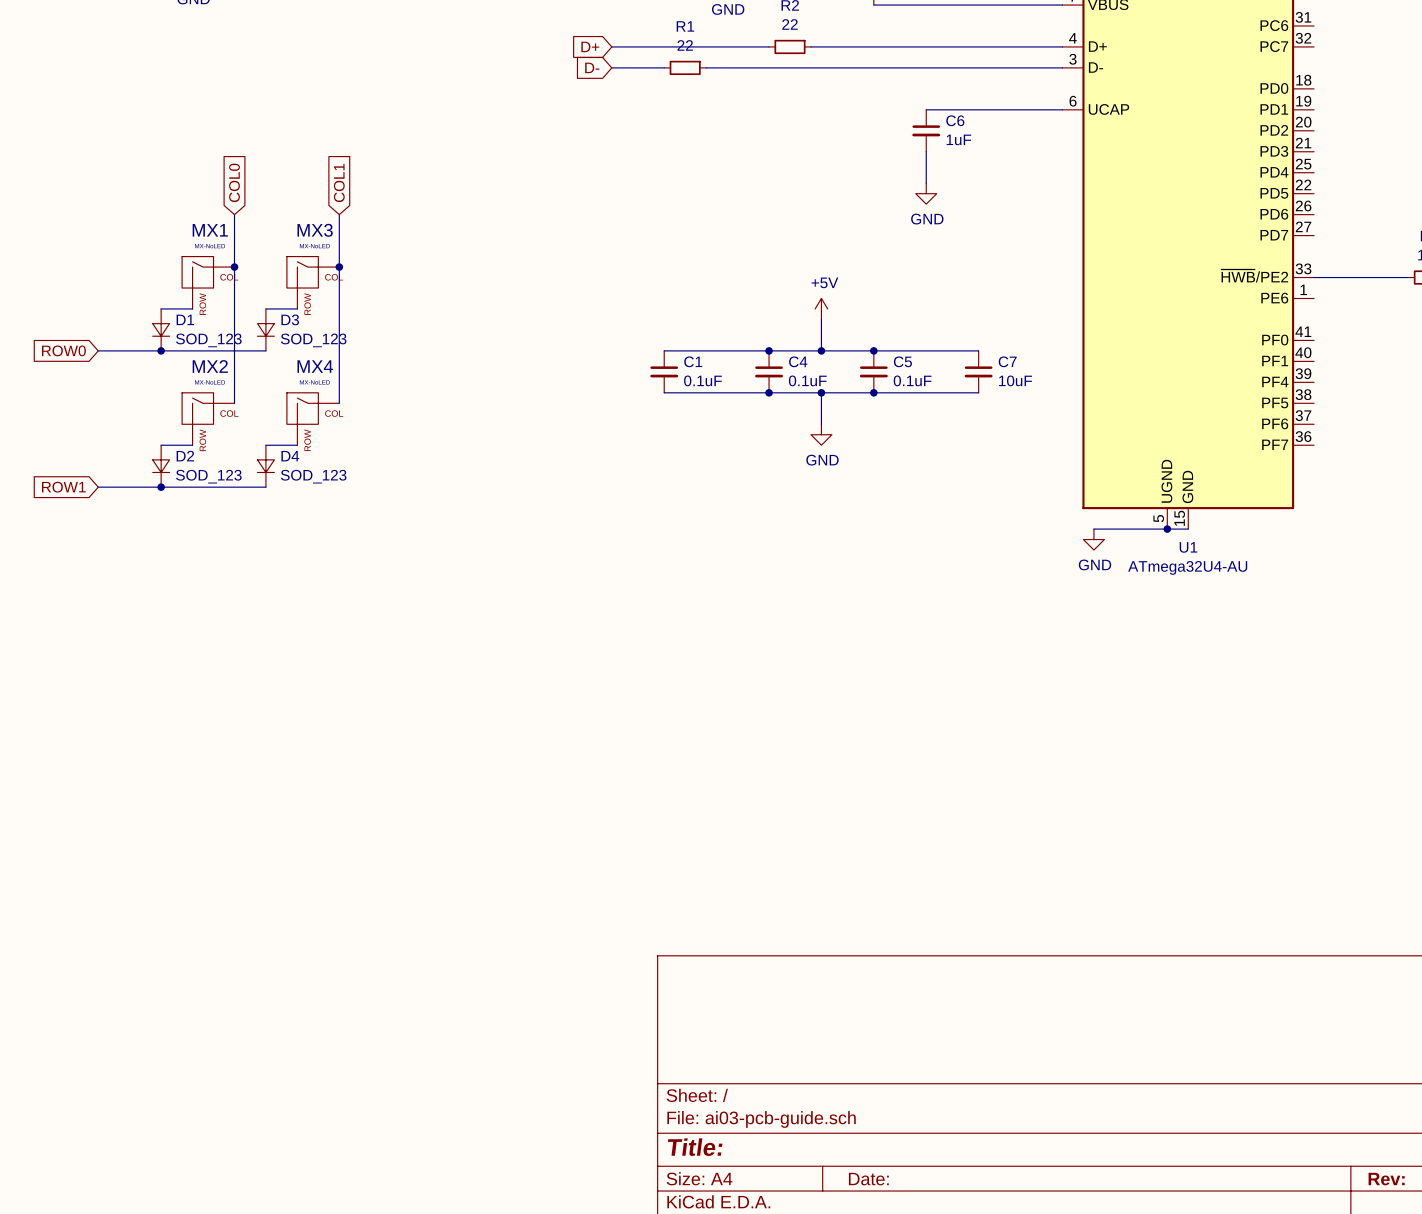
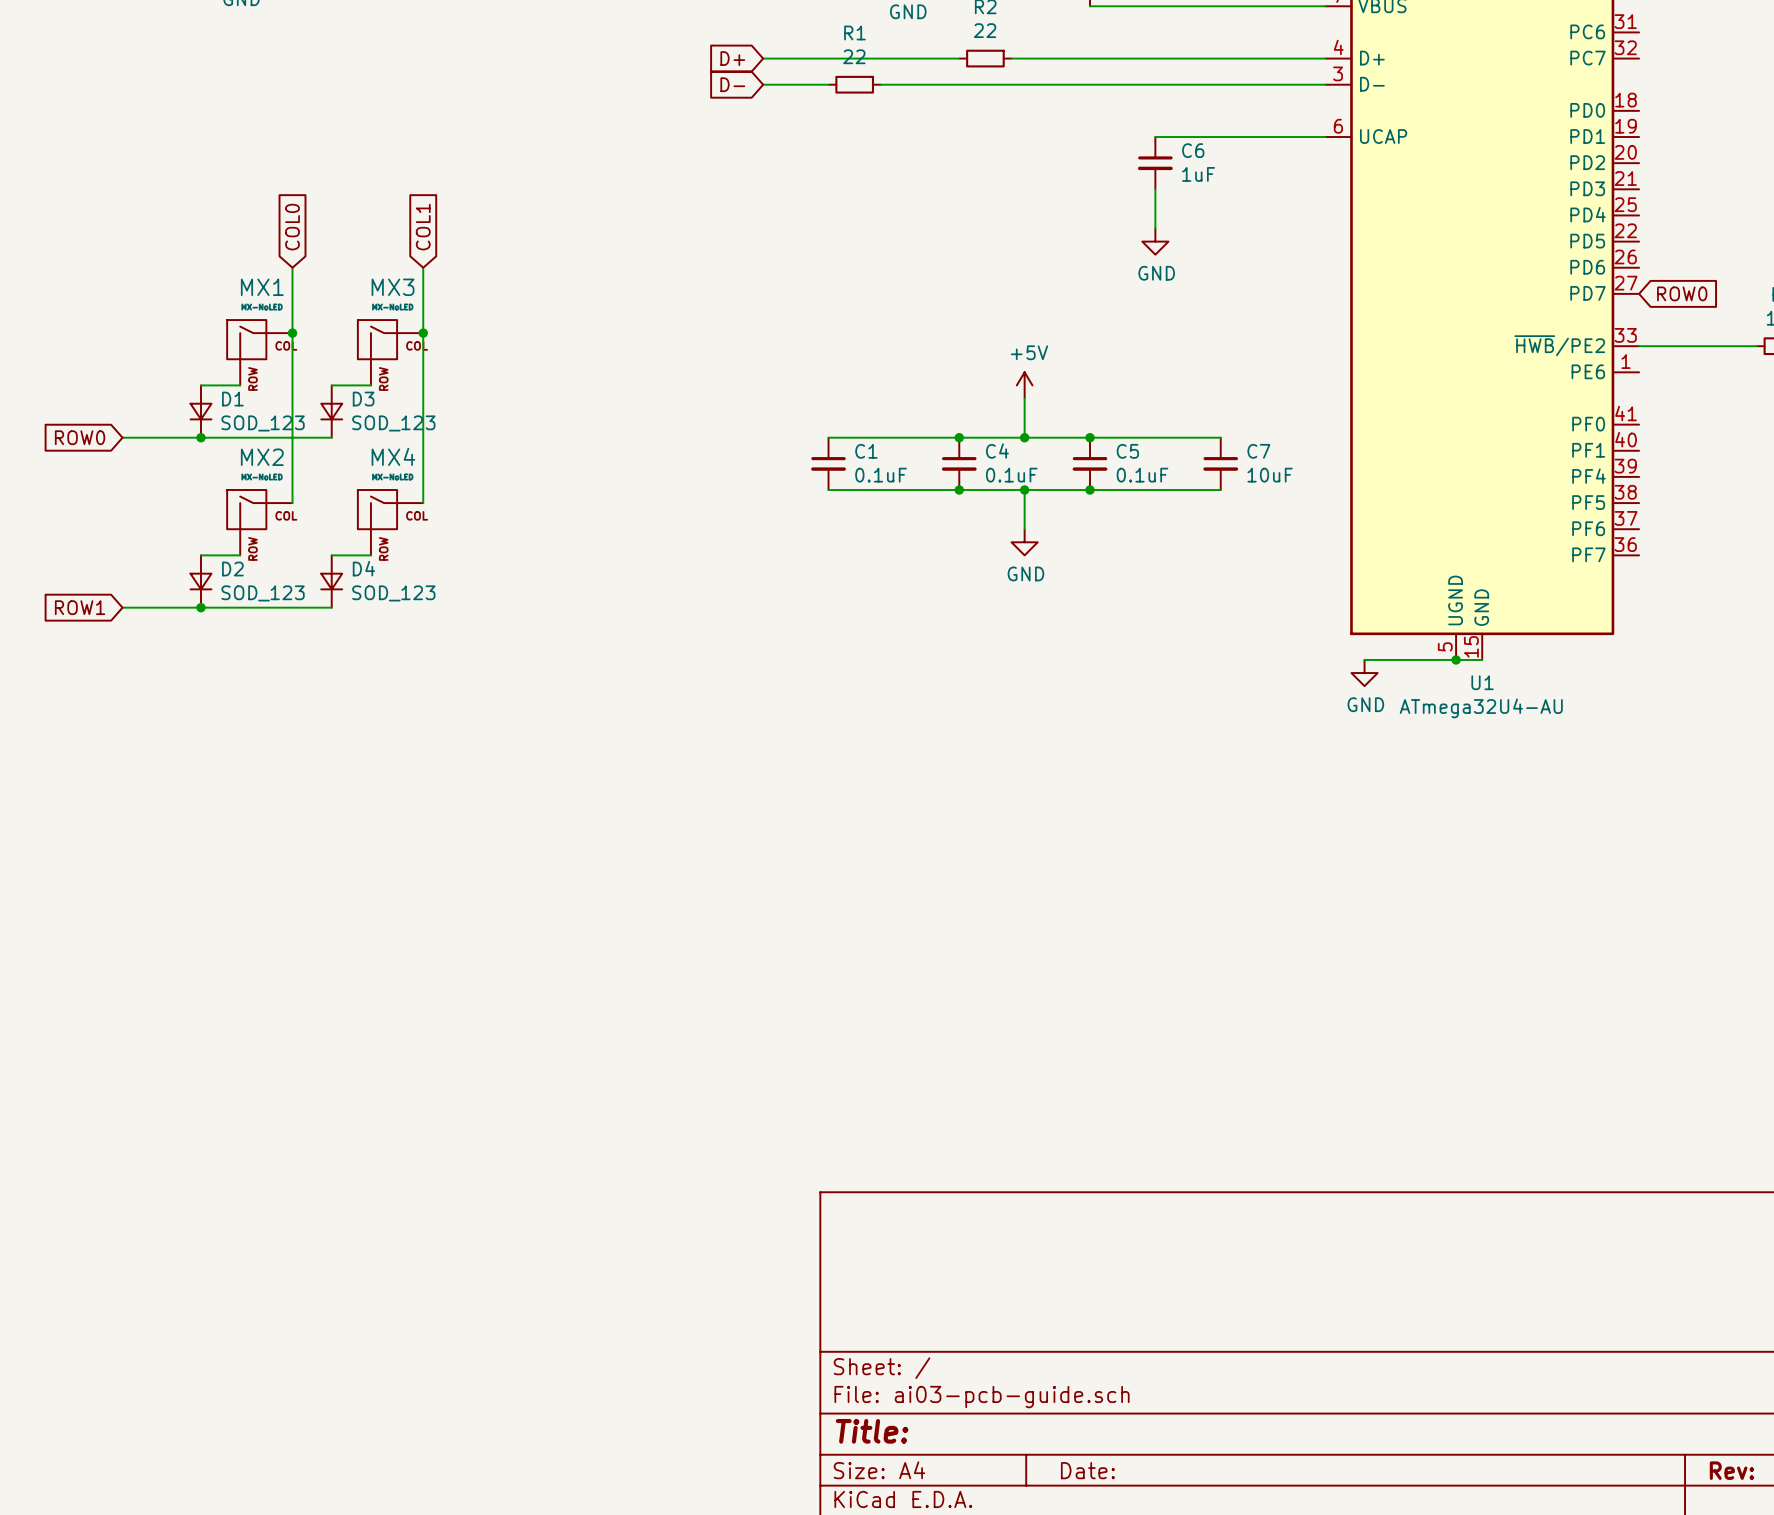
global label: none -> ROW0 (1682, 293)

